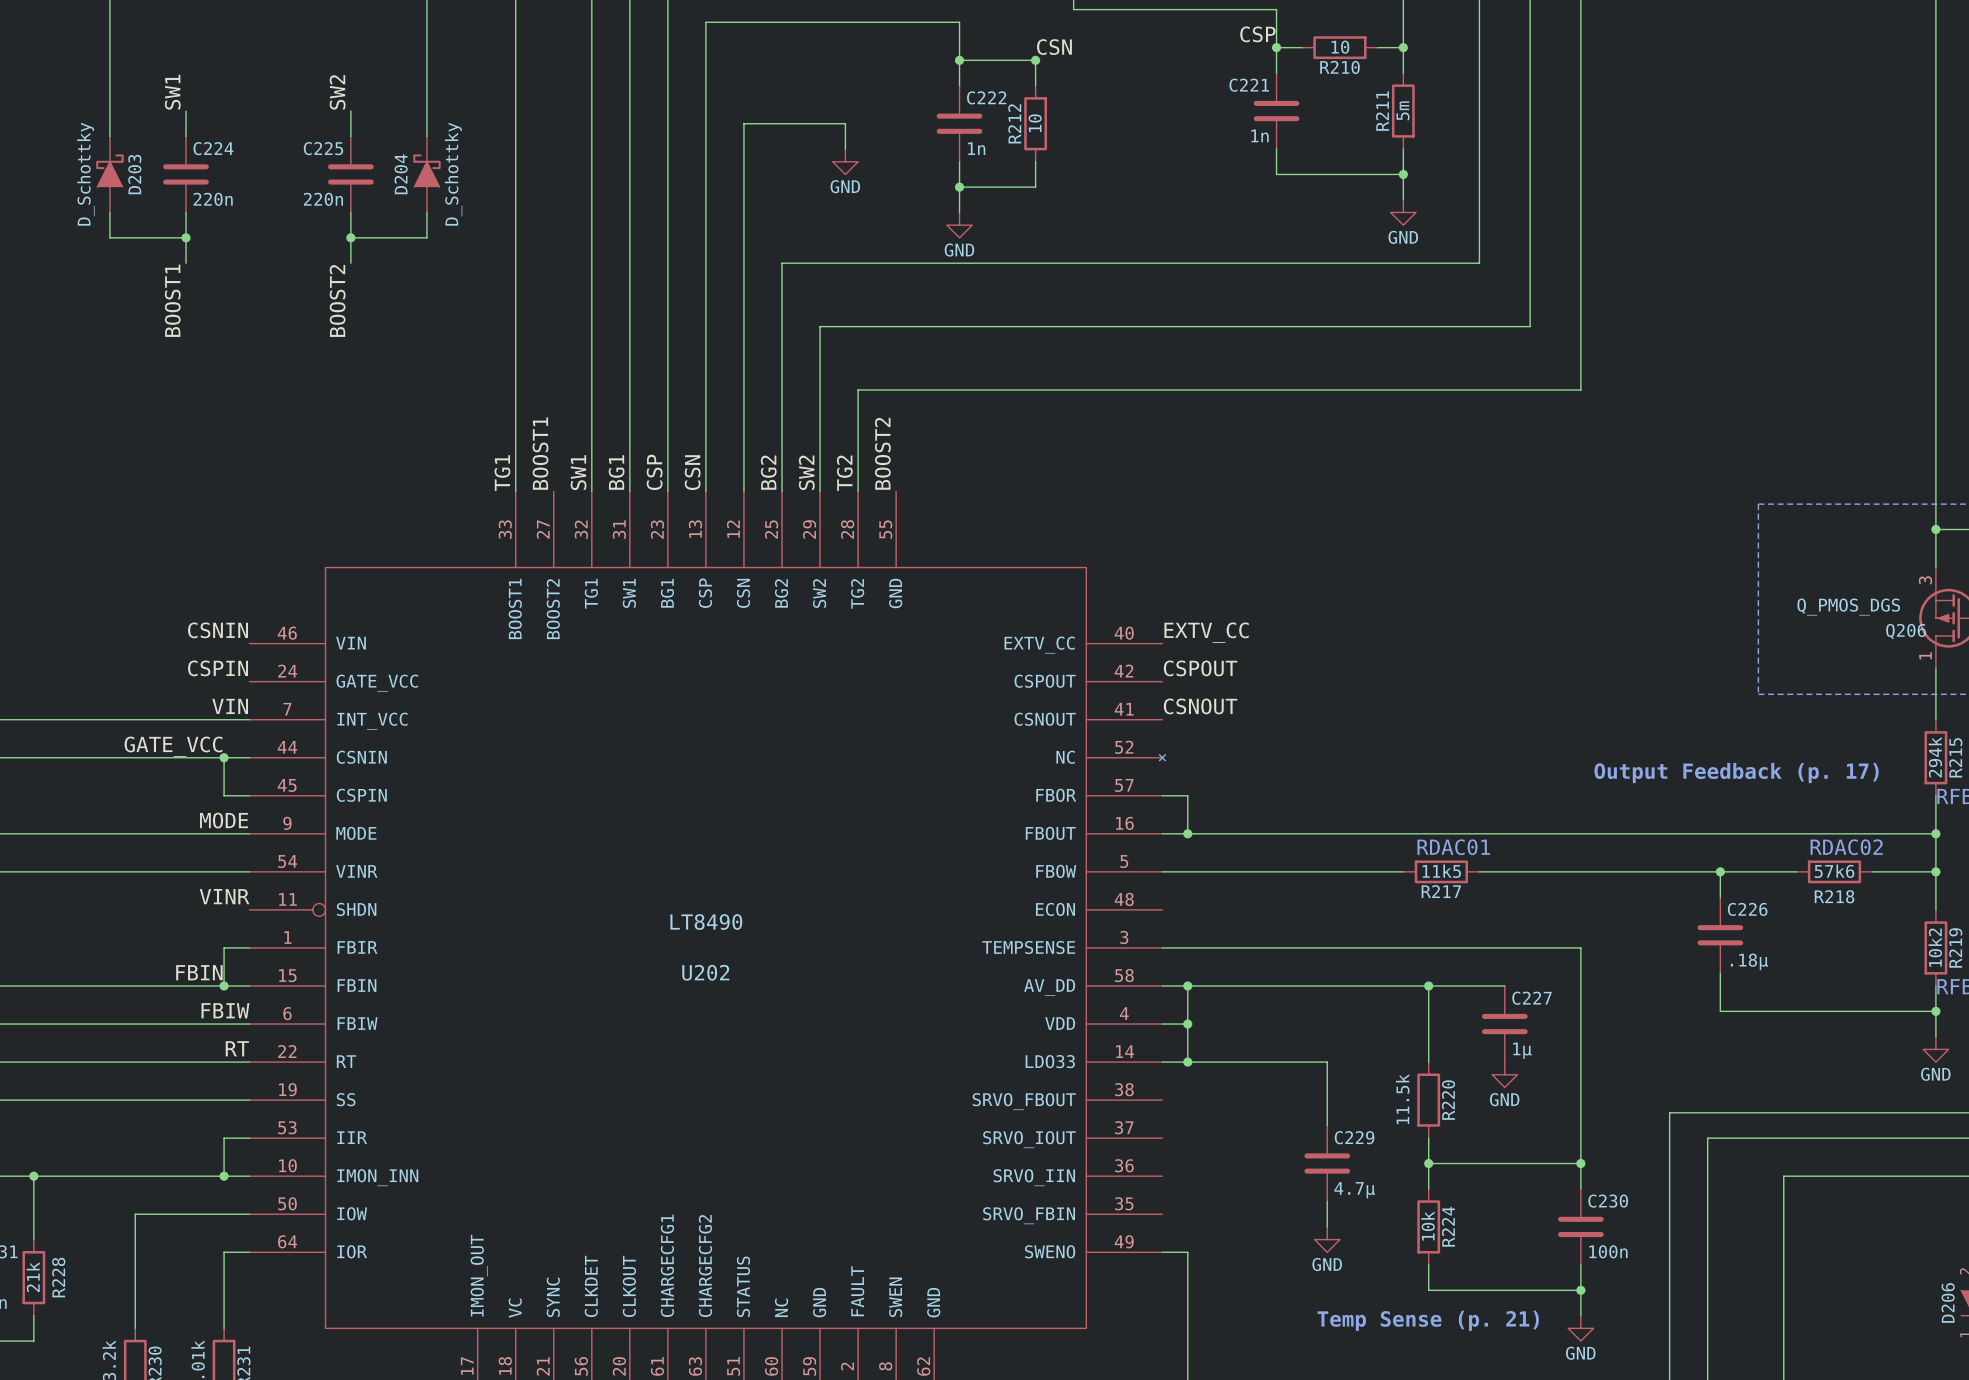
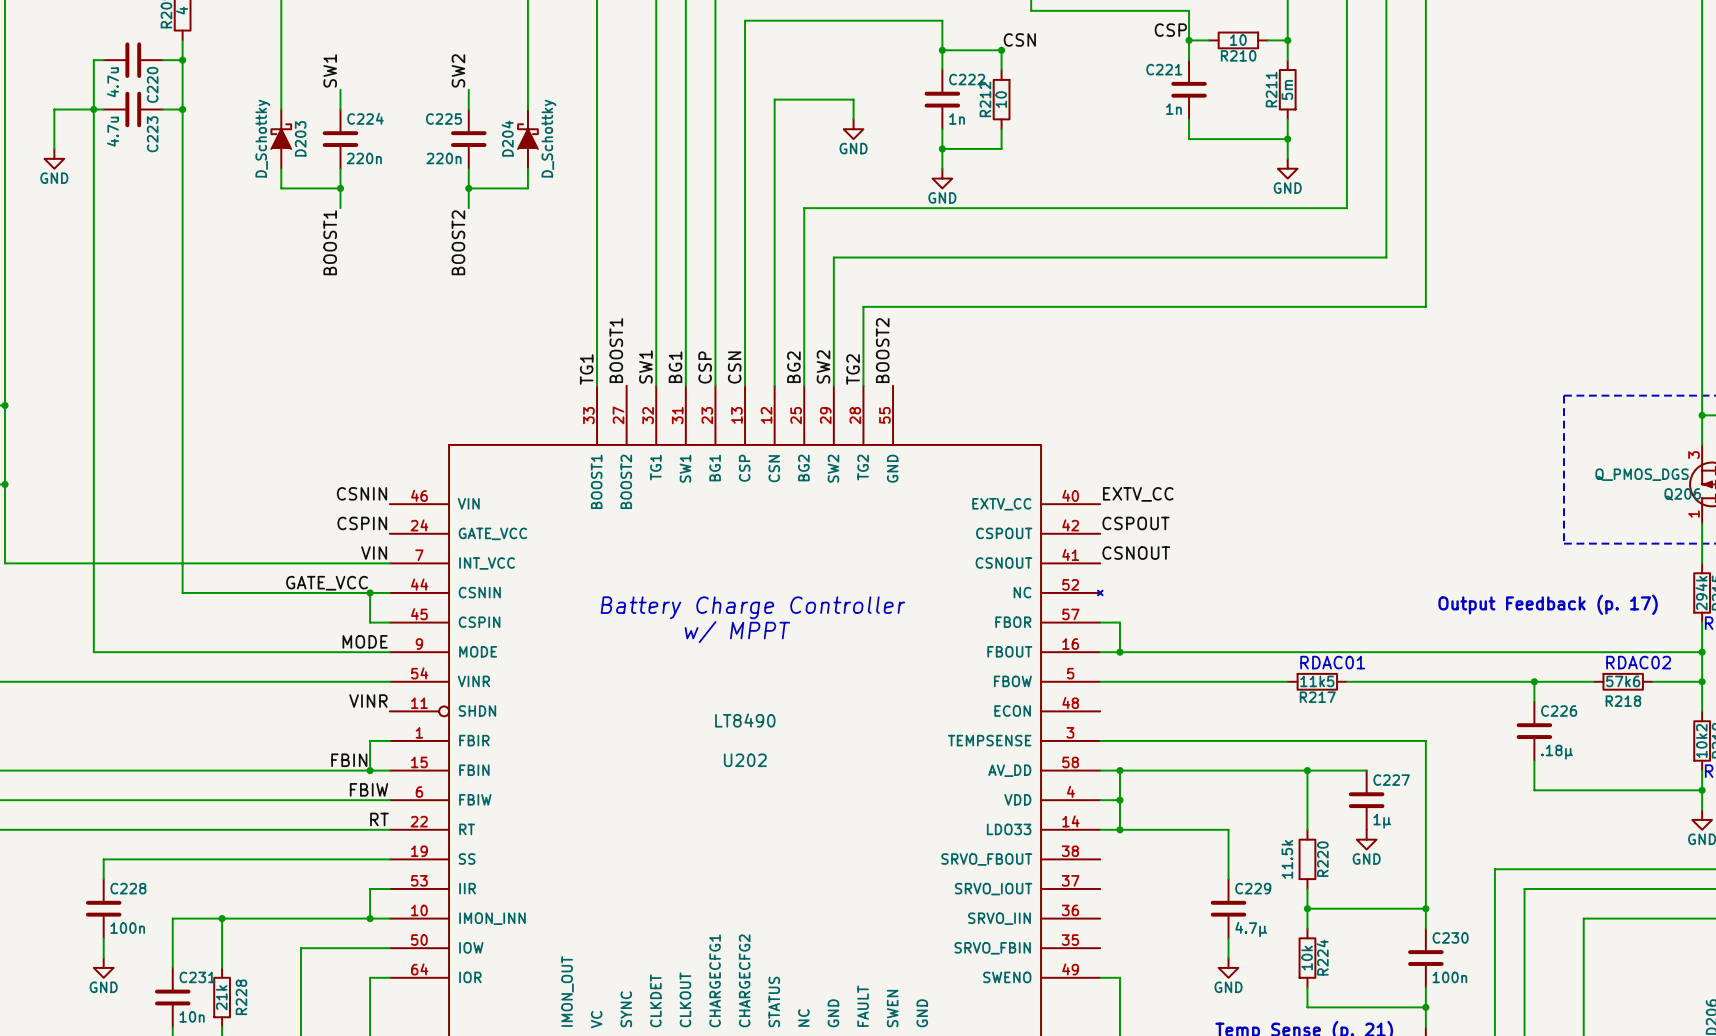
text: none -> Battery Charge Controller (752, 607)
text: none -> w/ MPPT (737, 632)

